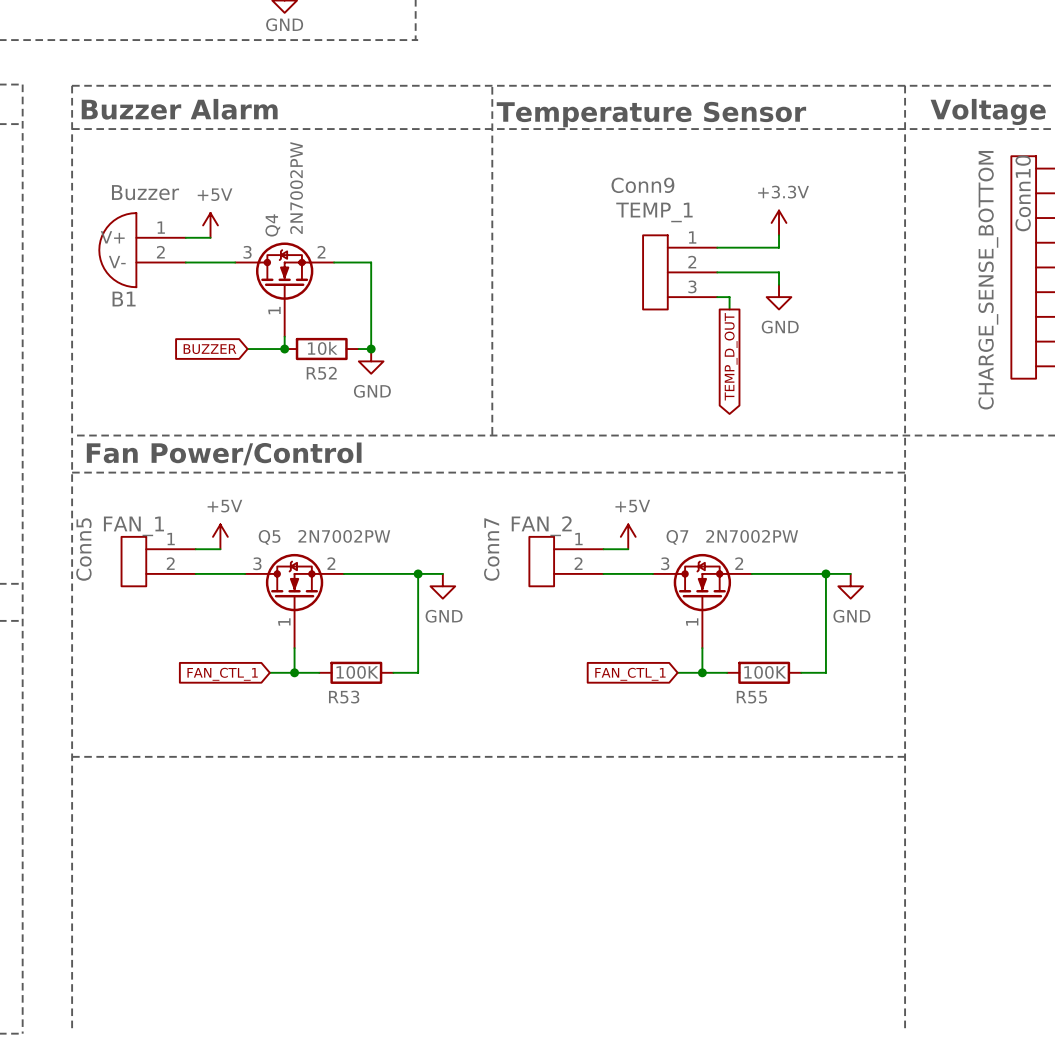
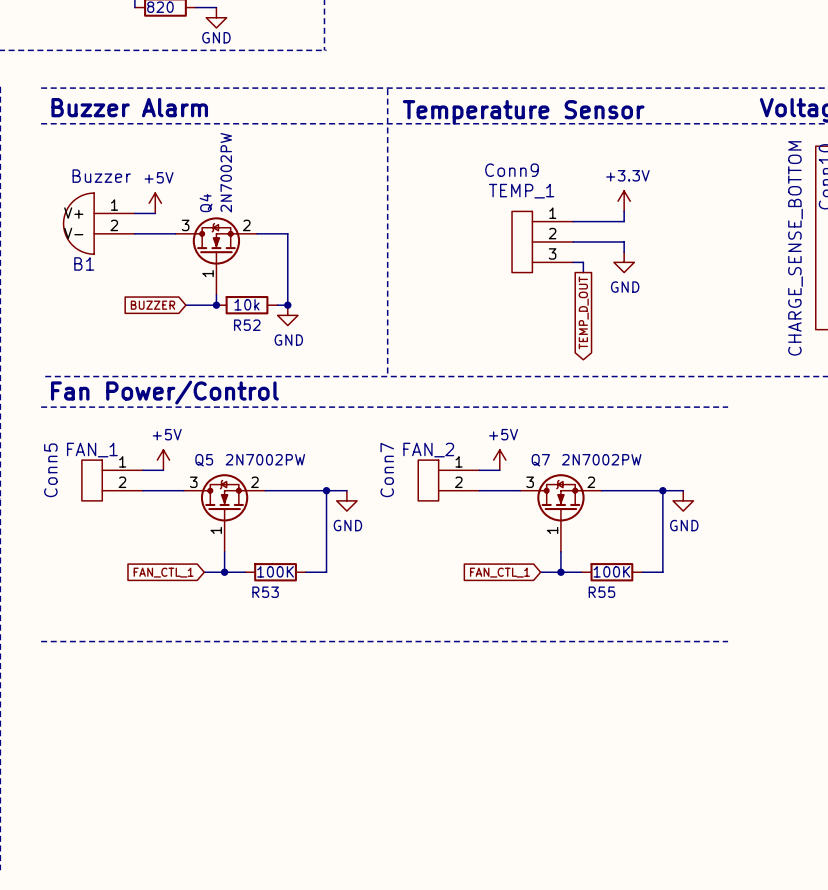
line: (72, 85) (72, 1031) -> none
line: (905, 85) (905, 1031) -> none

